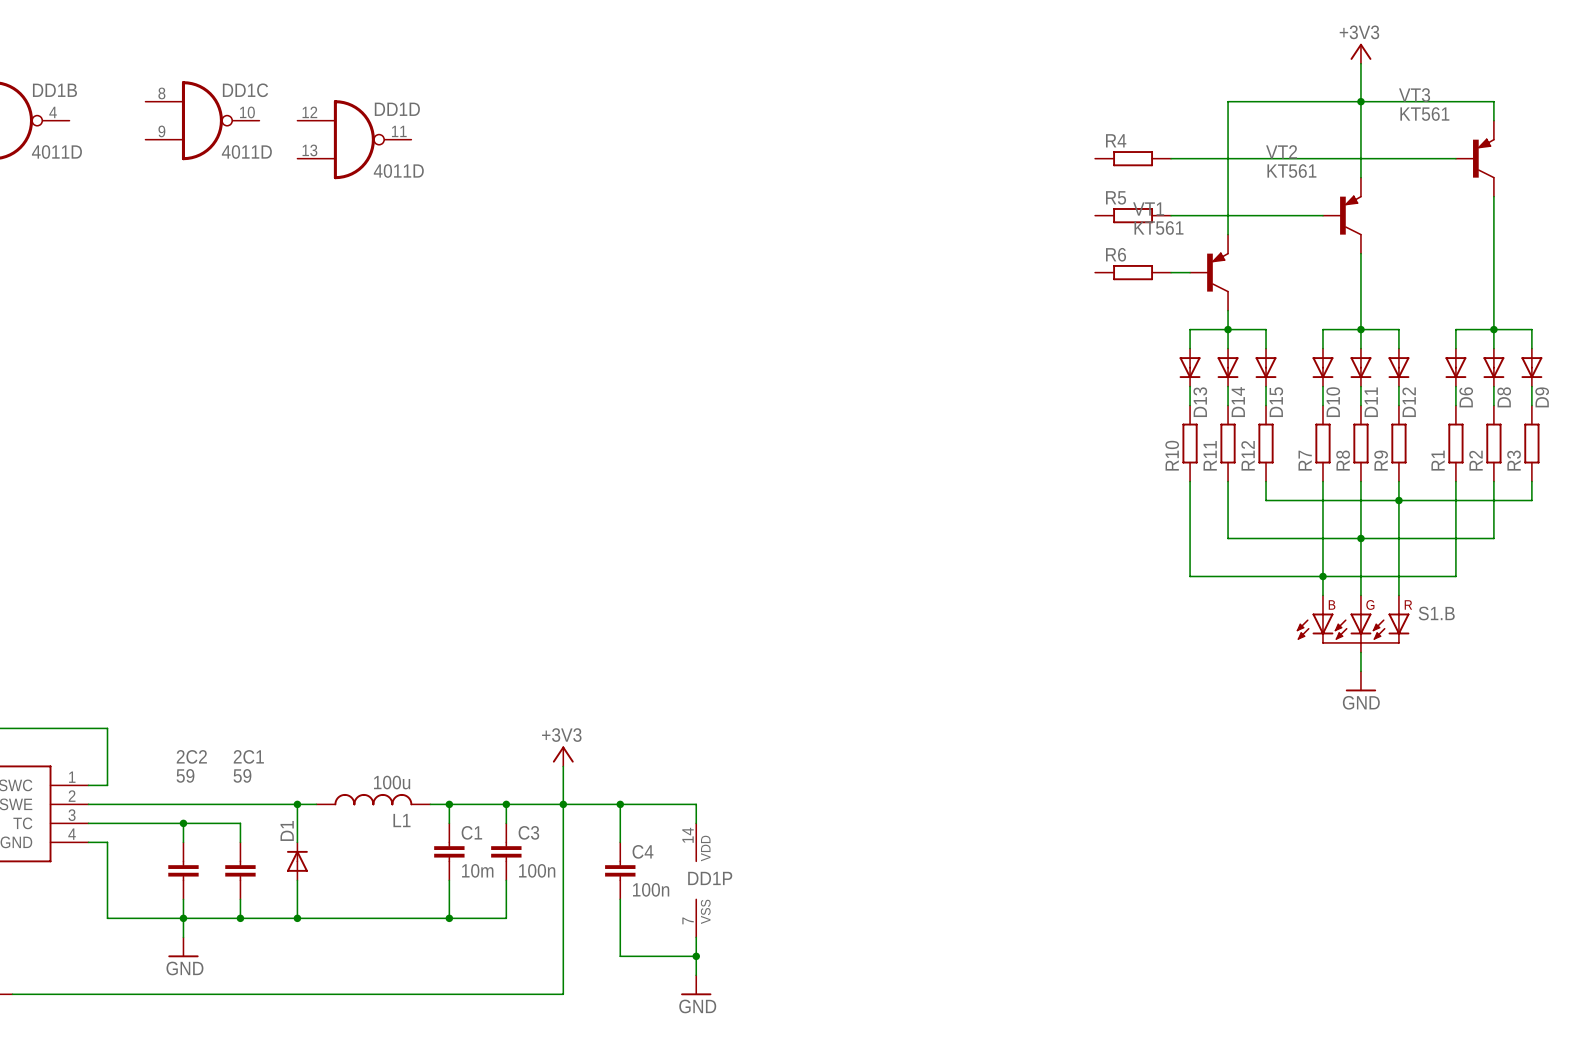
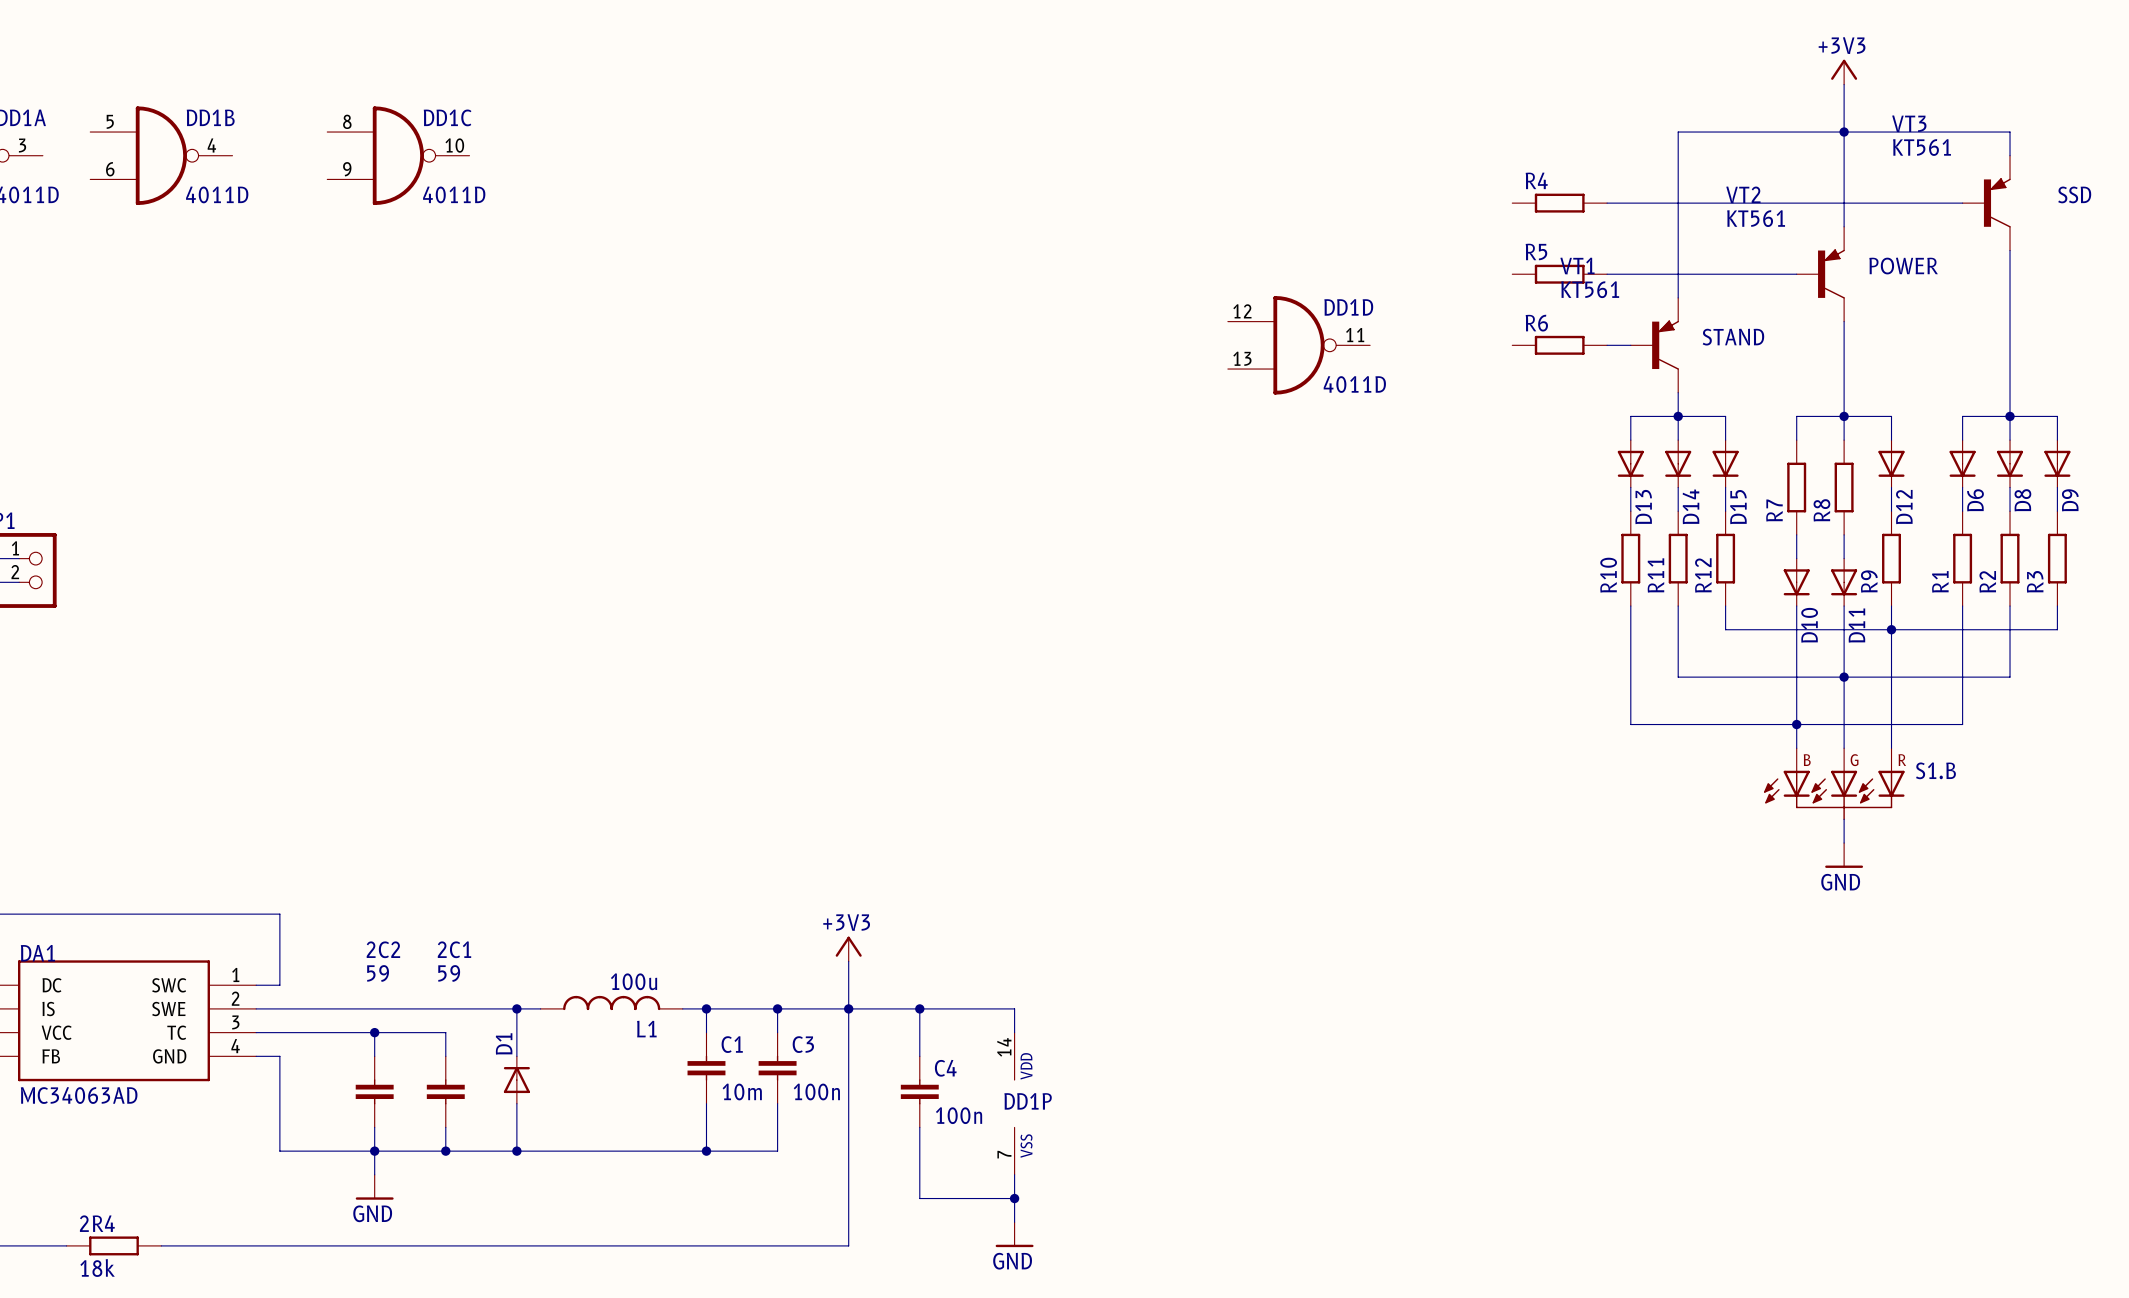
DD1D position: (354, 139) -> (1299, 345)
text: none -> SSD (2074, 194)
text: none -> POWER (1903, 266)
text: none -> STAND (1733, 337)
D10 position: (1322, 367) -> (1796, 582)
D11 position: (1360, 367) -> (1844, 582)
wire: (1322, 386) (1322, 405) -> (1796, 534) (1796, 558)
wire: (1360, 386) (1360, 405) -> (1844, 534) (1844, 558)
R7 position: (1322, 443) -> (1796, 487)
R8 position: (1360, 443) -> (1844, 487)

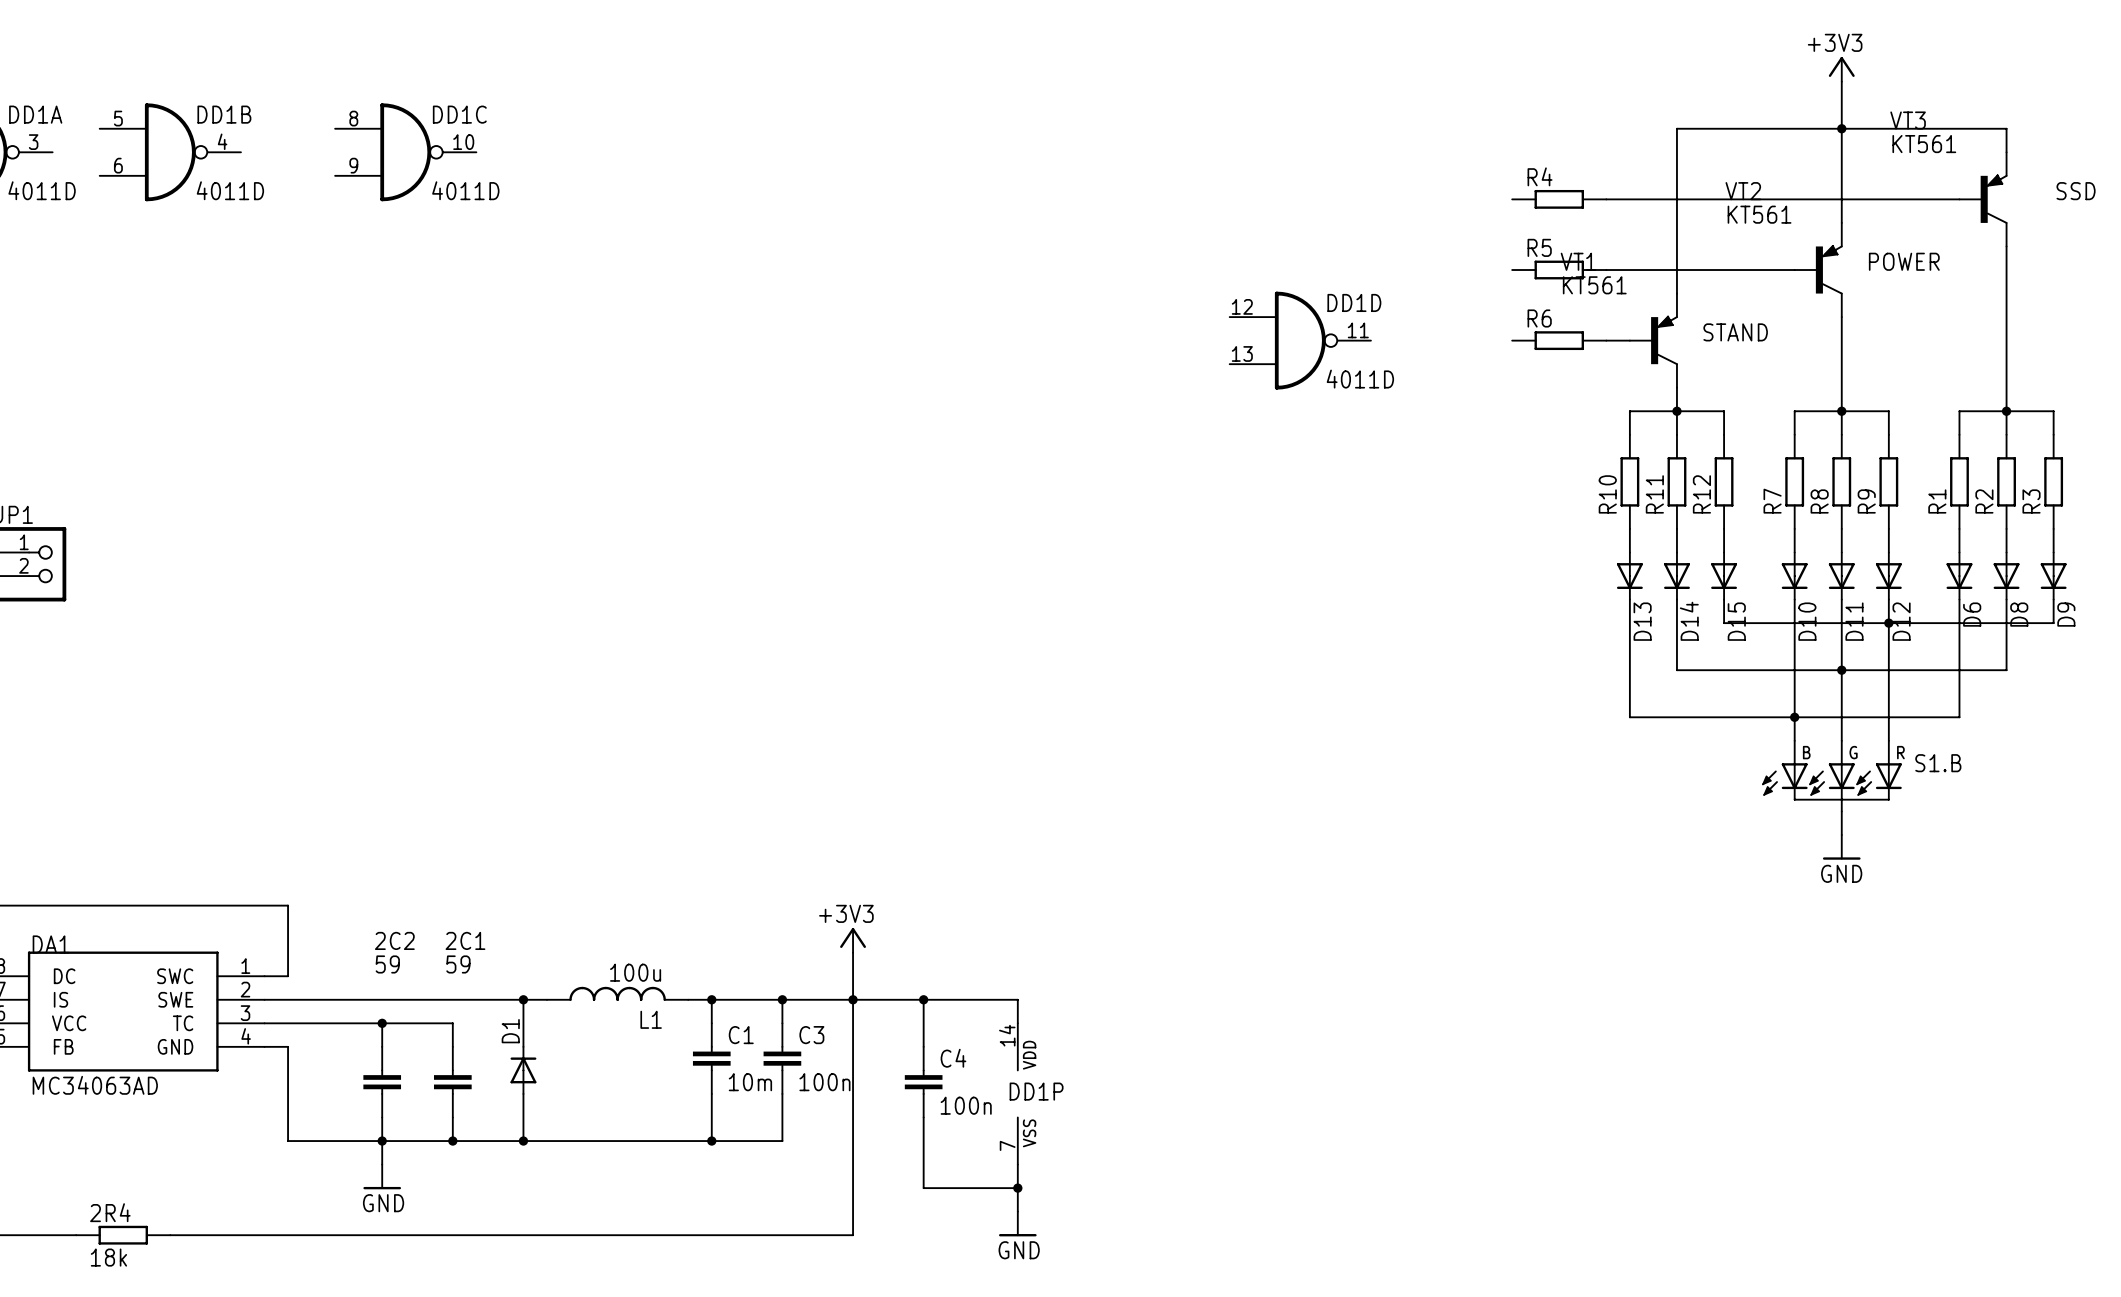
D13 position: (1630, 463) -> (1629, 576)
D14 position: (1678, 463) -> (1676, 576)
D15 position: (1725, 463) -> (1724, 576)
D12 position: (1891, 463) -> (1888, 576)
D6 position: (1962, 463) -> (1959, 576)
D8 position: (2010, 463) -> (2006, 576)
D9 position: (2057, 463) -> (2053, 576)
wire: (1630, 487) (1630, 511) -> (1629, 528) (1629, 552)
wire: (1678, 487) (1678, 511) -> (1676, 528) (1676, 552)
wire: (1725, 487) (1725, 511) -> (1724, 528) (1724, 552)
wire: (1891, 487) (1891, 511) -> (1888, 528) (1888, 552)
wire: (1962, 487) (1962, 511) -> (1959, 528) (1959, 552)
wire: (2010, 487) (2010, 511) -> (2006, 528) (2006, 552)
wire: (2057, 487) (2057, 511) -> (2053, 528) (2053, 552)
R10 position: (1630, 558) -> (1629, 481)
R11 position: (1678, 558) -> (1676, 481)
R12 position: (1725, 558) -> (1724, 481)
R9 position: (1891, 558) -> (1888, 481)
R1 position: (1962, 558) -> (1959, 481)
R2 position: (2010, 558) -> (2006, 481)
R3 position: (2057, 558) -> (2053, 481)

